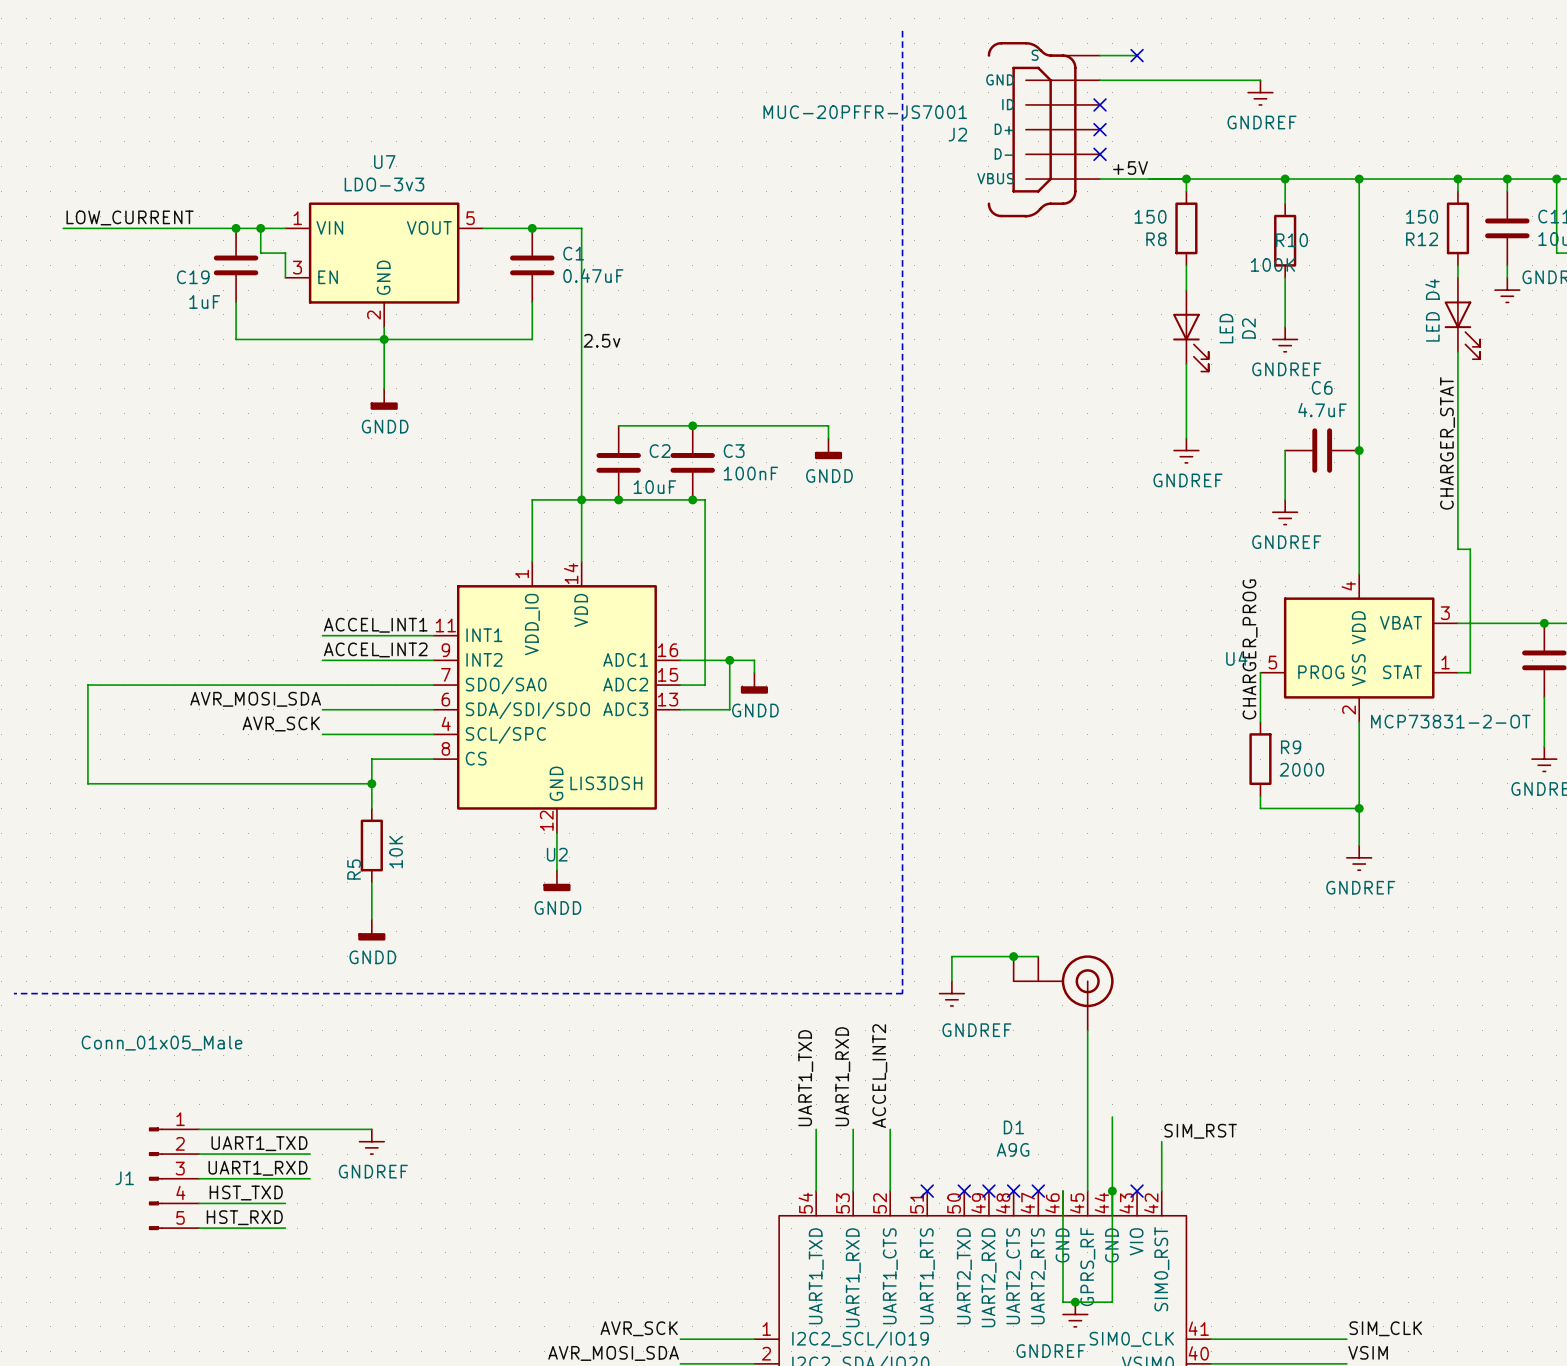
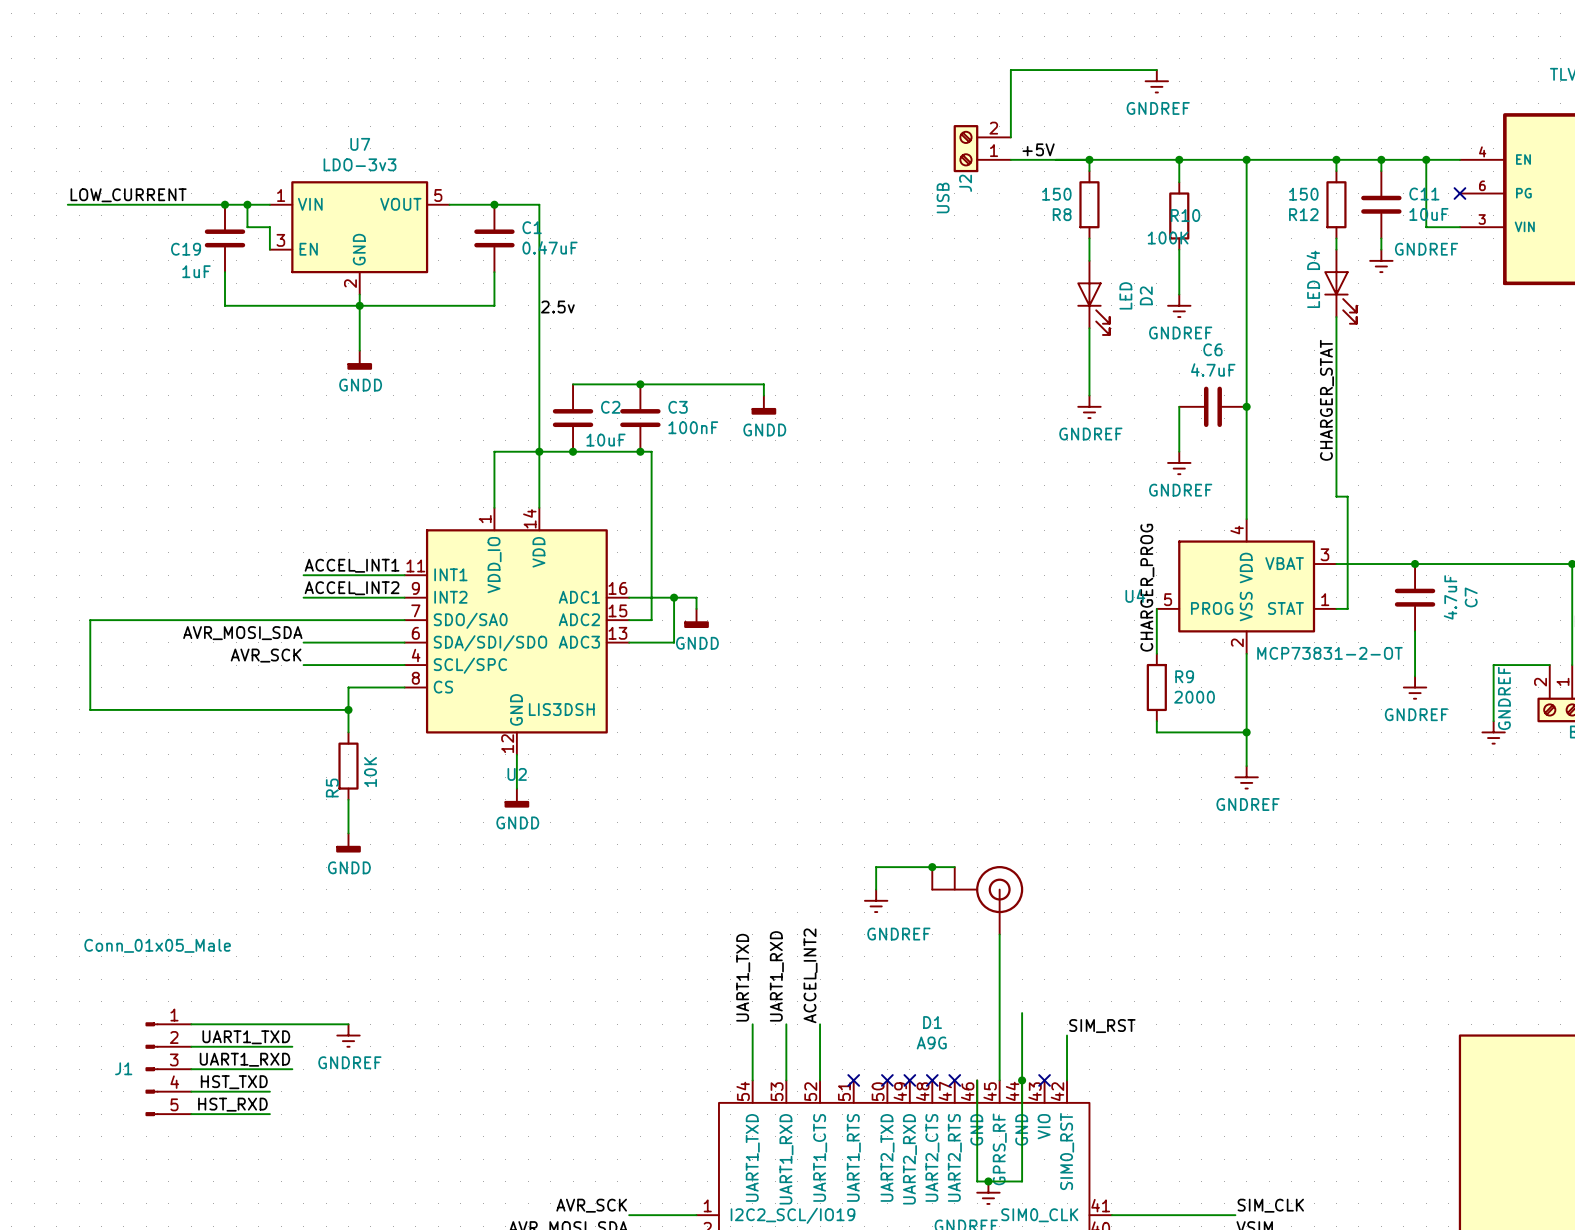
line: (902, 30) (902, 993) (13, 993) -> none
J2 symbol: [987, 42, 1101, 218] -> [953, 125, 1011, 173]
wire: (1100, 55) (1137, 55) -> none
no-connect mark: (1137, 55) -> none
wire: none -> (1010, 70) (1010, 137)
no-connect mark: (1100, 104) -> none
J2 value: MUC-20PFFR-JS7001 (865, 112) -> USB (943, 197)
no-connect mark: (1100, 129) -> none
J2 name position: J2 (957, 134) -> J2 (965, 183)
no-connect mark: (1100, 154) -> none

